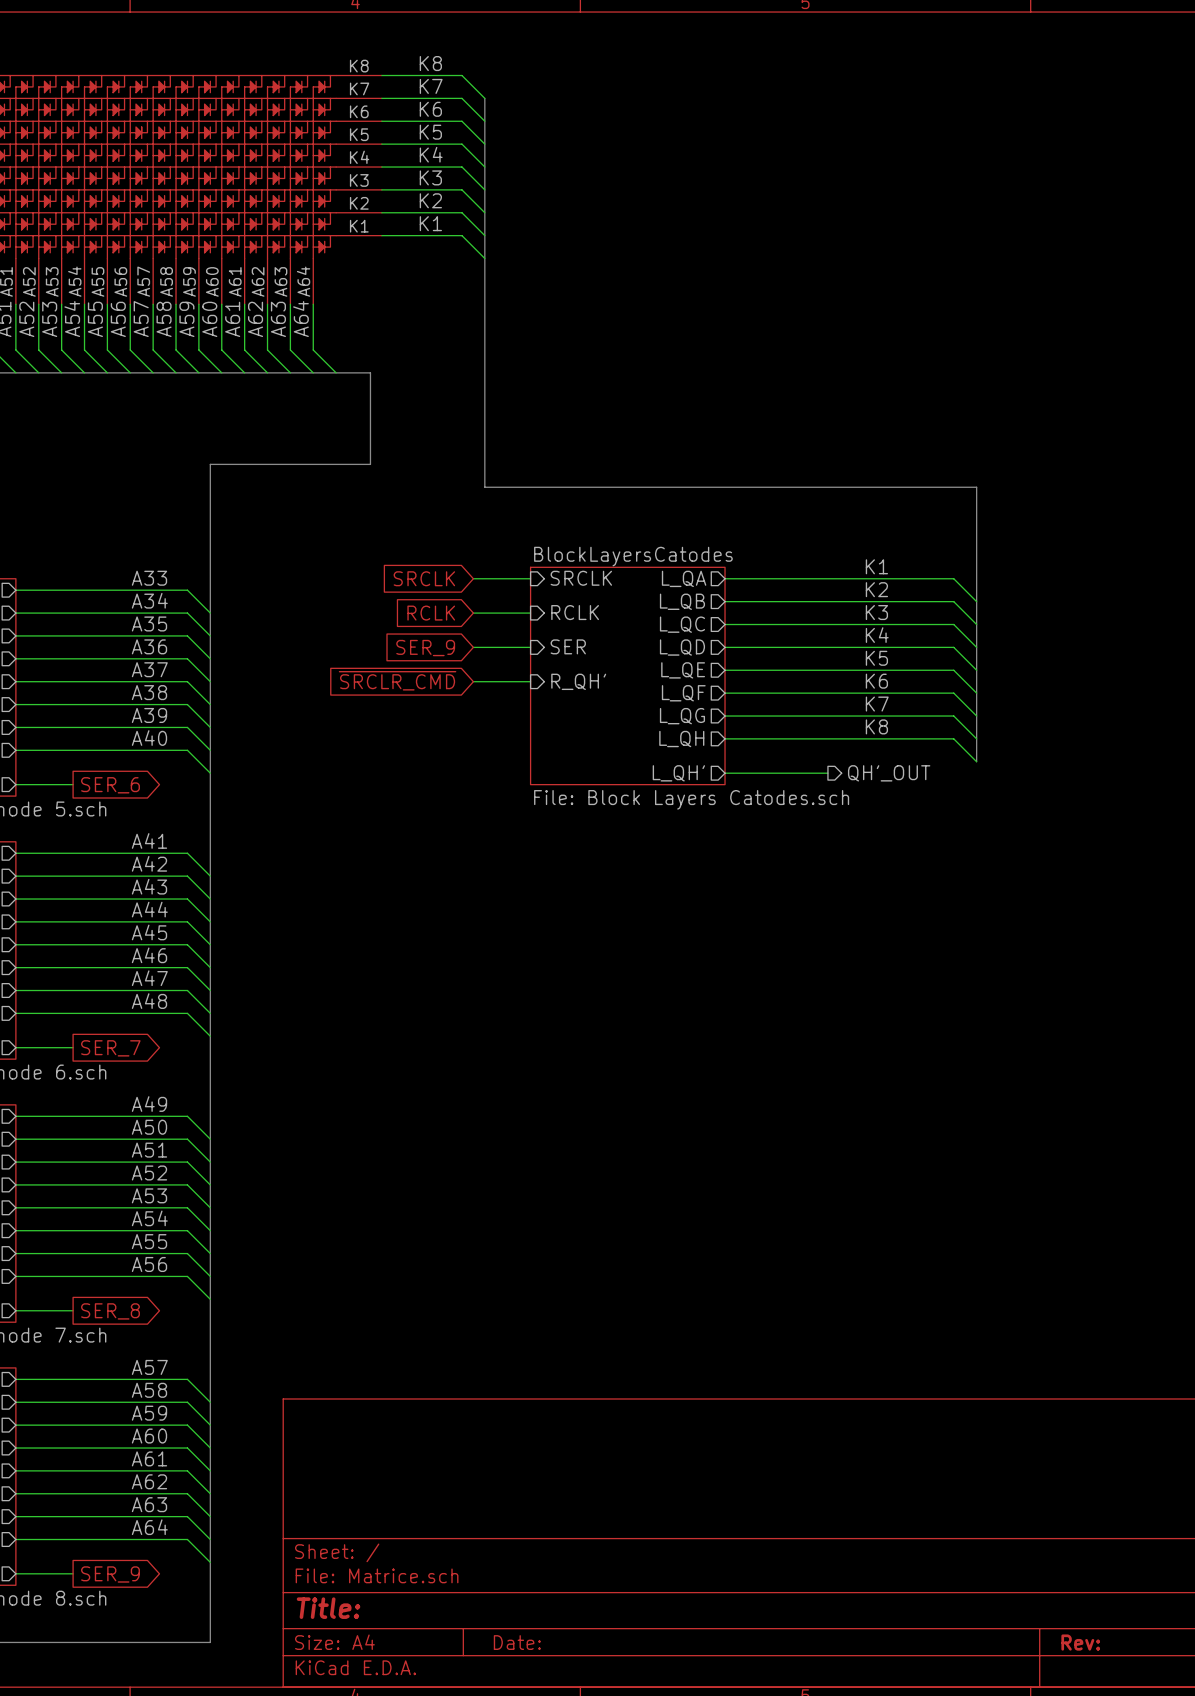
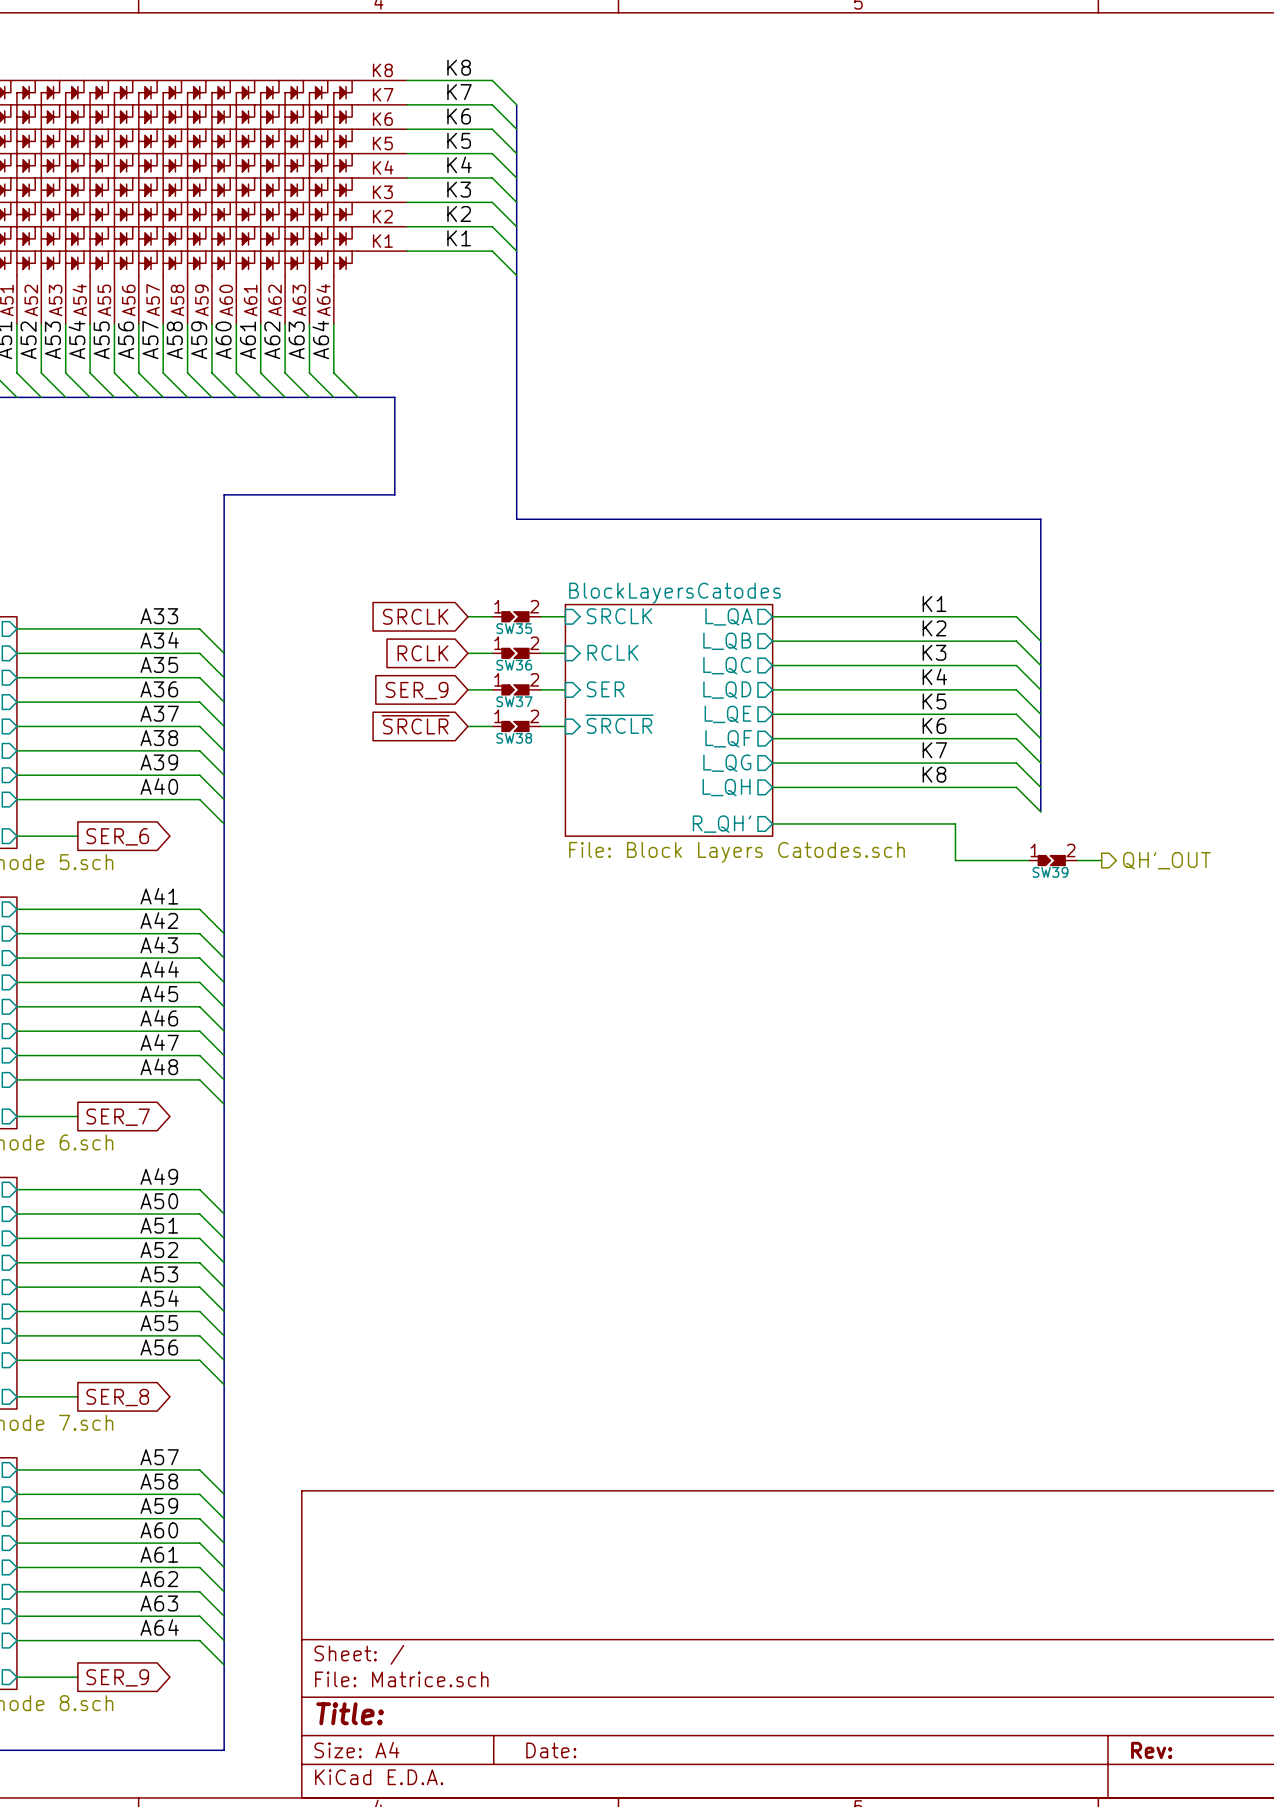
global label position: SRCLK (424, 578) -> SRCLK (415, 616)
wire: none -> (467, 616) (492, 616)
SW35: none -> (516, 616)
global label position: RCLK (431, 613) -> RCLK (422, 653)
wire: none -> (467, 653) (492, 653)
SW36: none -> (516, 653)
wire: none -> (467, 689) (492, 689)
SW37: none -> (516, 689)
global label position: SER_9 (425, 648) -> SER_9 (417, 690)
global label: ~{SRCLR_CMD} (397, 680) -> ~{SRCLR} (415, 724)
wire: none -> (467, 726) (492, 726)
SW38: none -> (516, 726)
sheet pin: R_QH' (578, 681) -> ~{SRCLR} (619, 724)
sheet pin: L_QH' (678, 773) -> R_QH' (722, 824)
wire: none -> (882, 823) (955, 823) (955, 860) (1028, 860)
hierarchical label position: QH'_OUT (889, 773) -> QH'_OUT (1166, 860)
SW39: none -> (1052, 860)
wire: none -> (1077, 860) (1101, 860)

